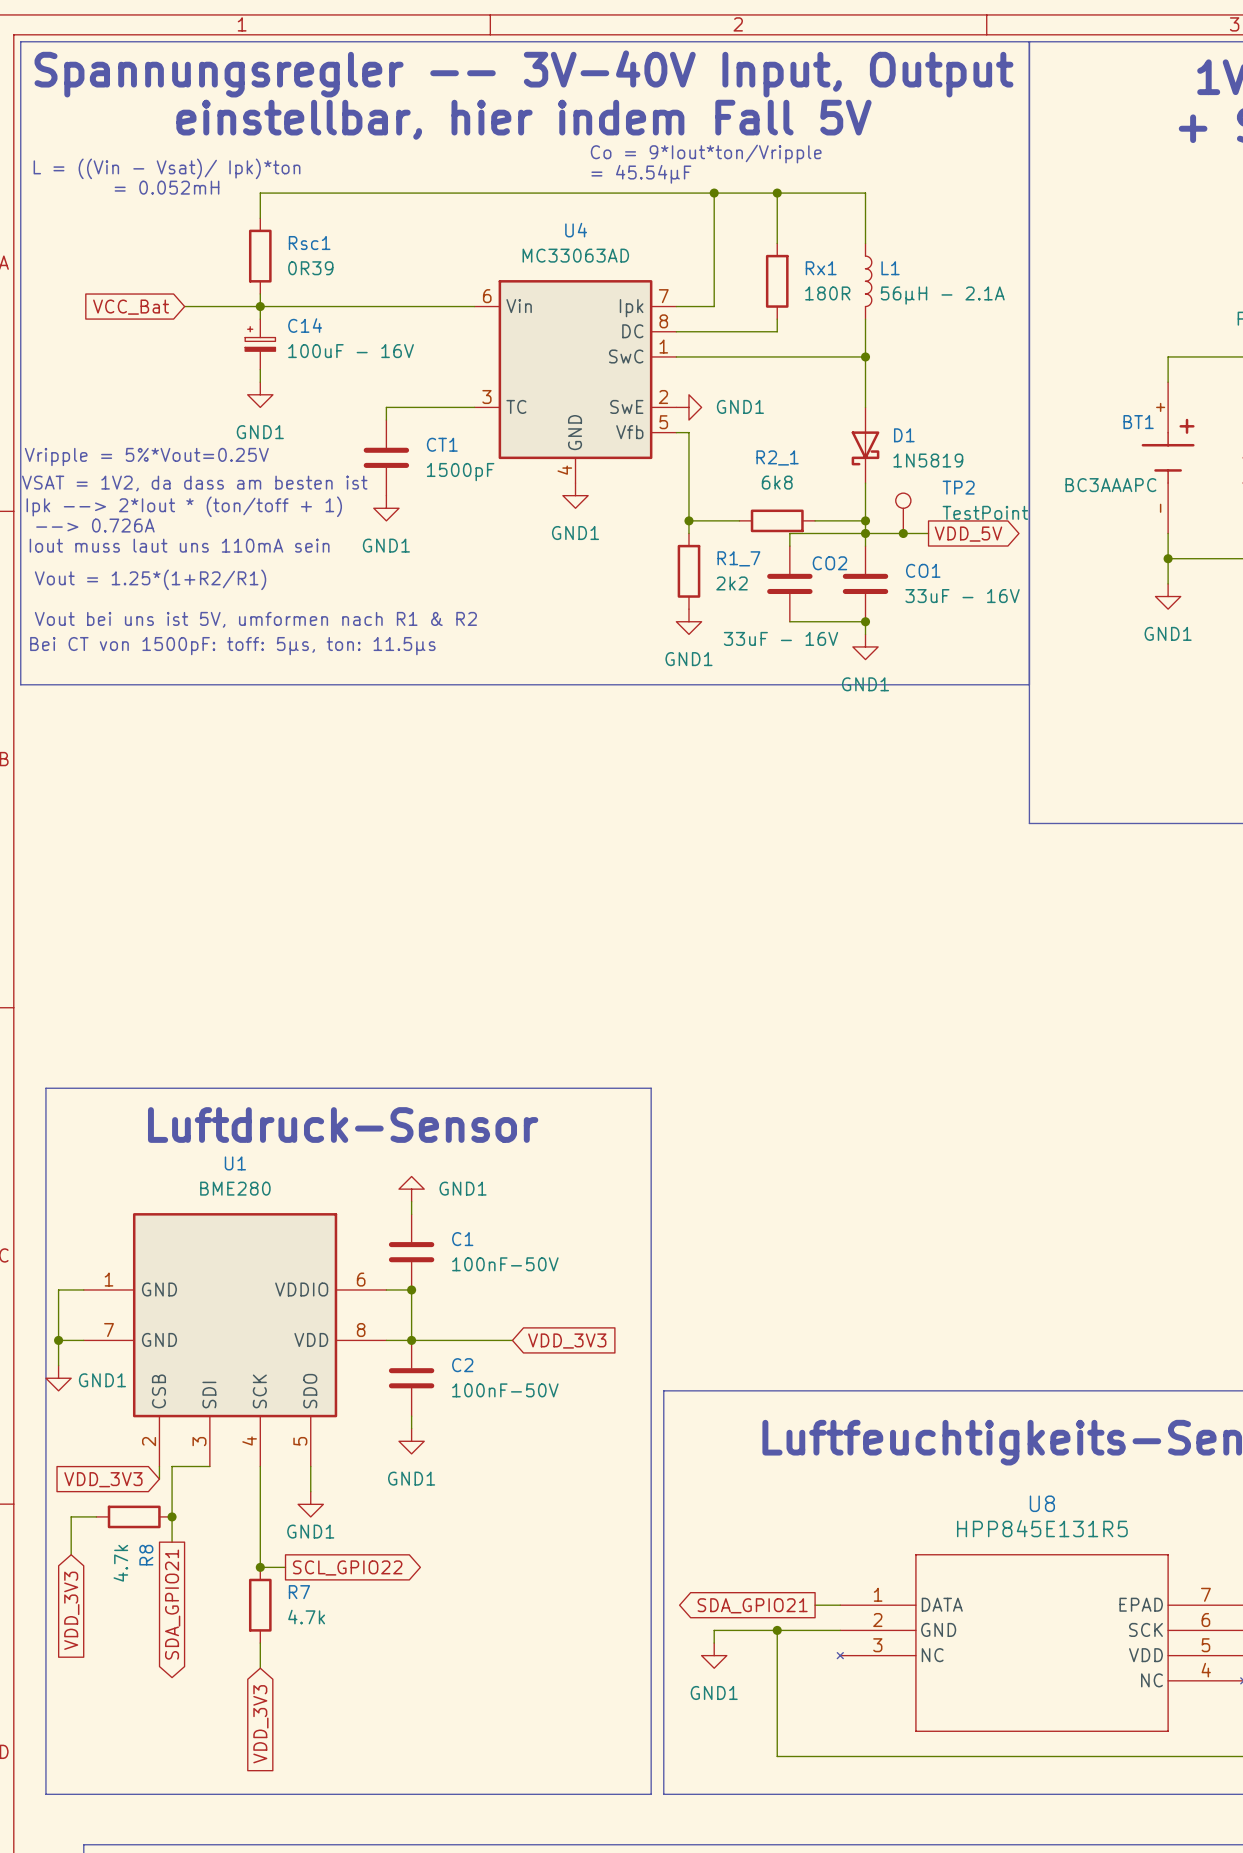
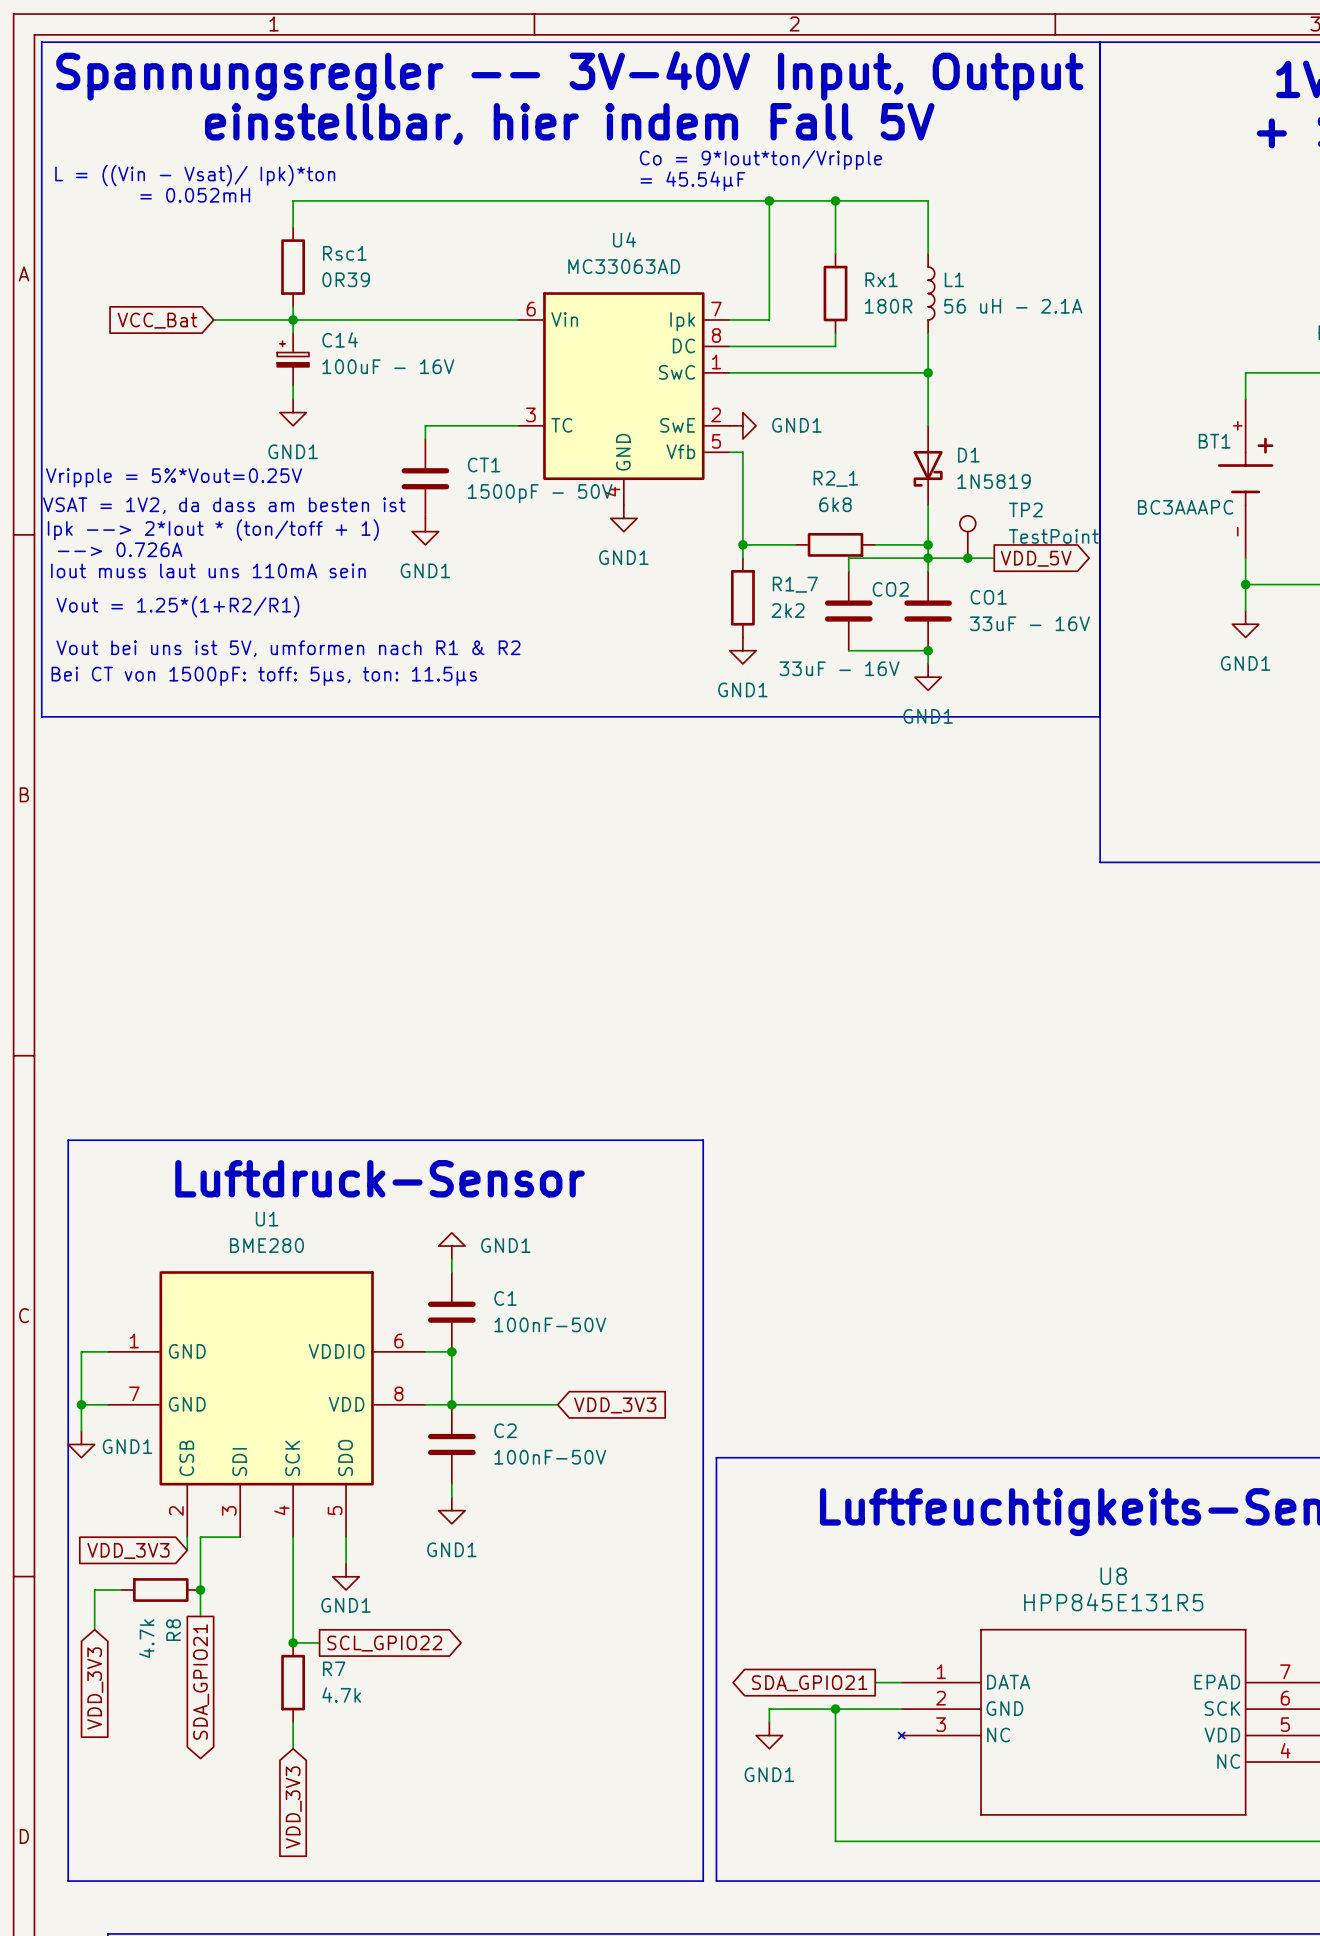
L1 value: 56µH - 2.1A (942, 295) -> 56 uH - 2.1A (1013, 306)
CT1 value: 1500pF (460, 472) -> 1500pF - 50V (540, 493)

